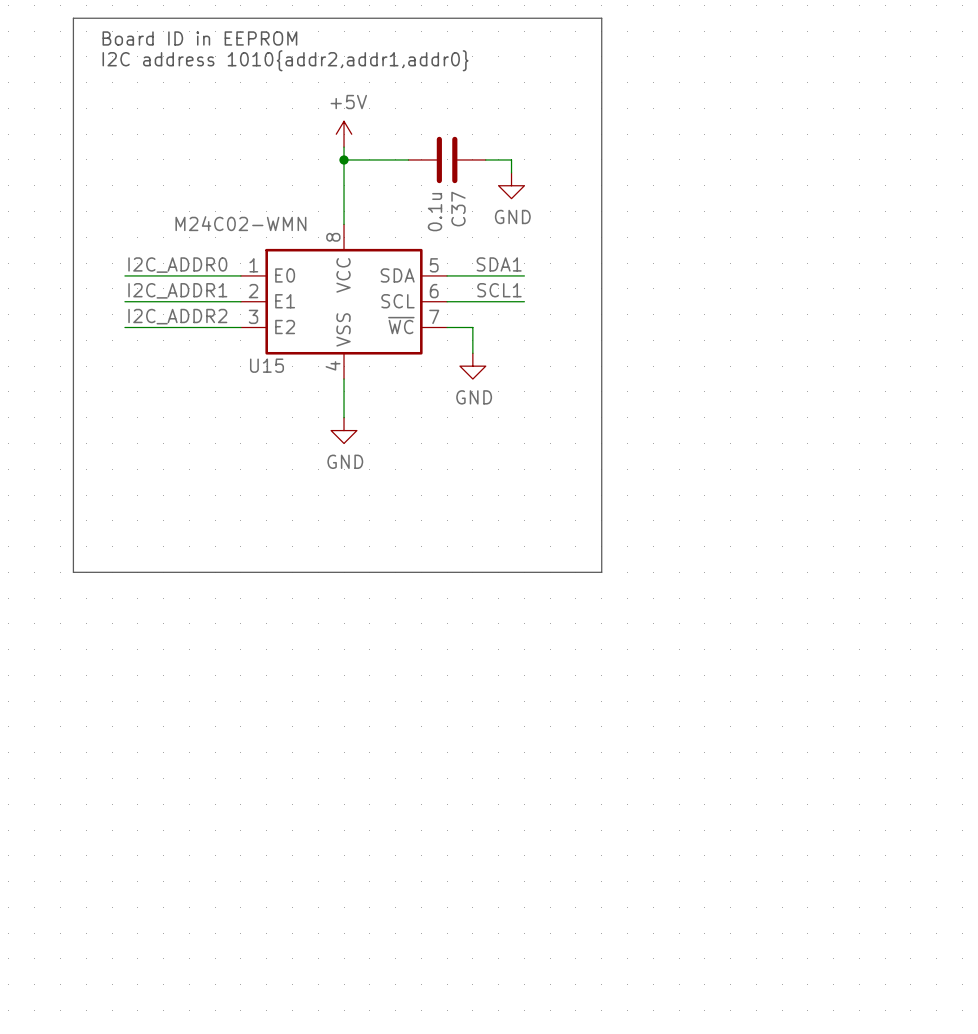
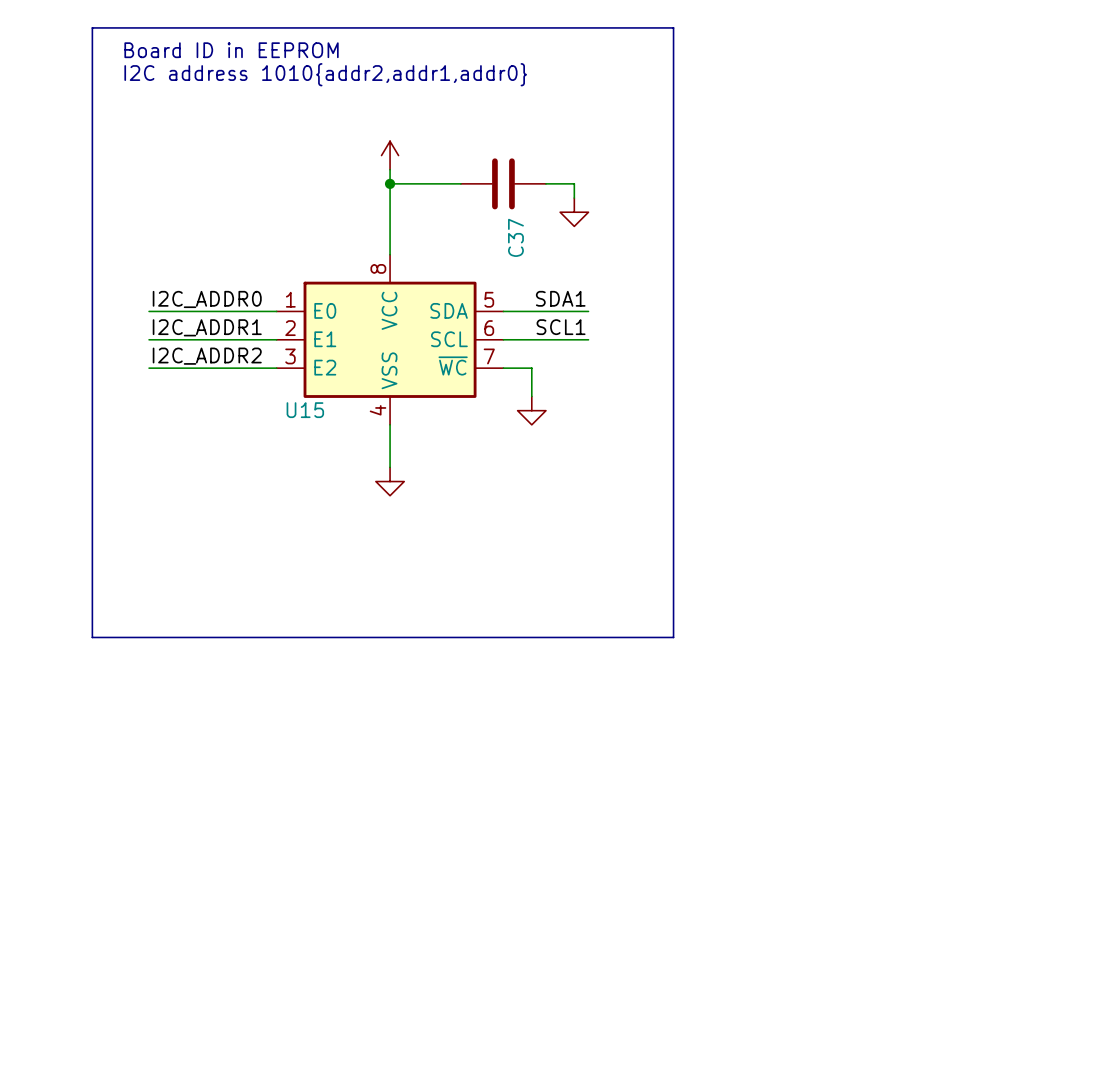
power symbol text: +5V (348, 102) -> none
C37 value: 0.1u (435, 212) -> none
power symbol text: GND (512, 216) -> none
U15 value: M24C02-WMN (240, 223) -> none
power symbol text: GND (474, 397) -> none
power symbol text: GND (345, 461) -> none

